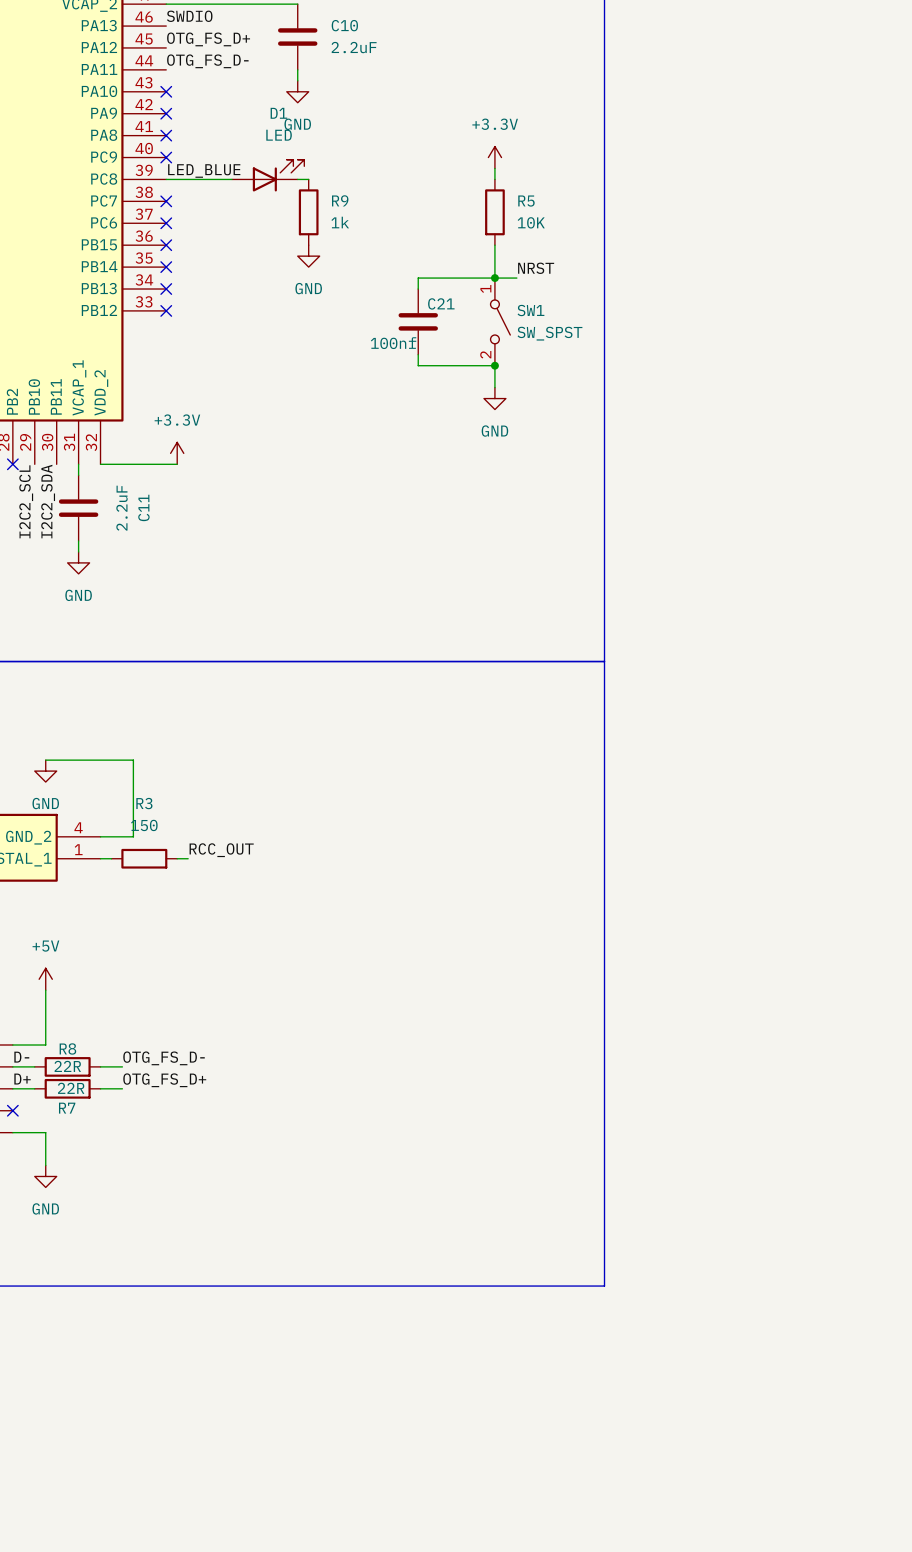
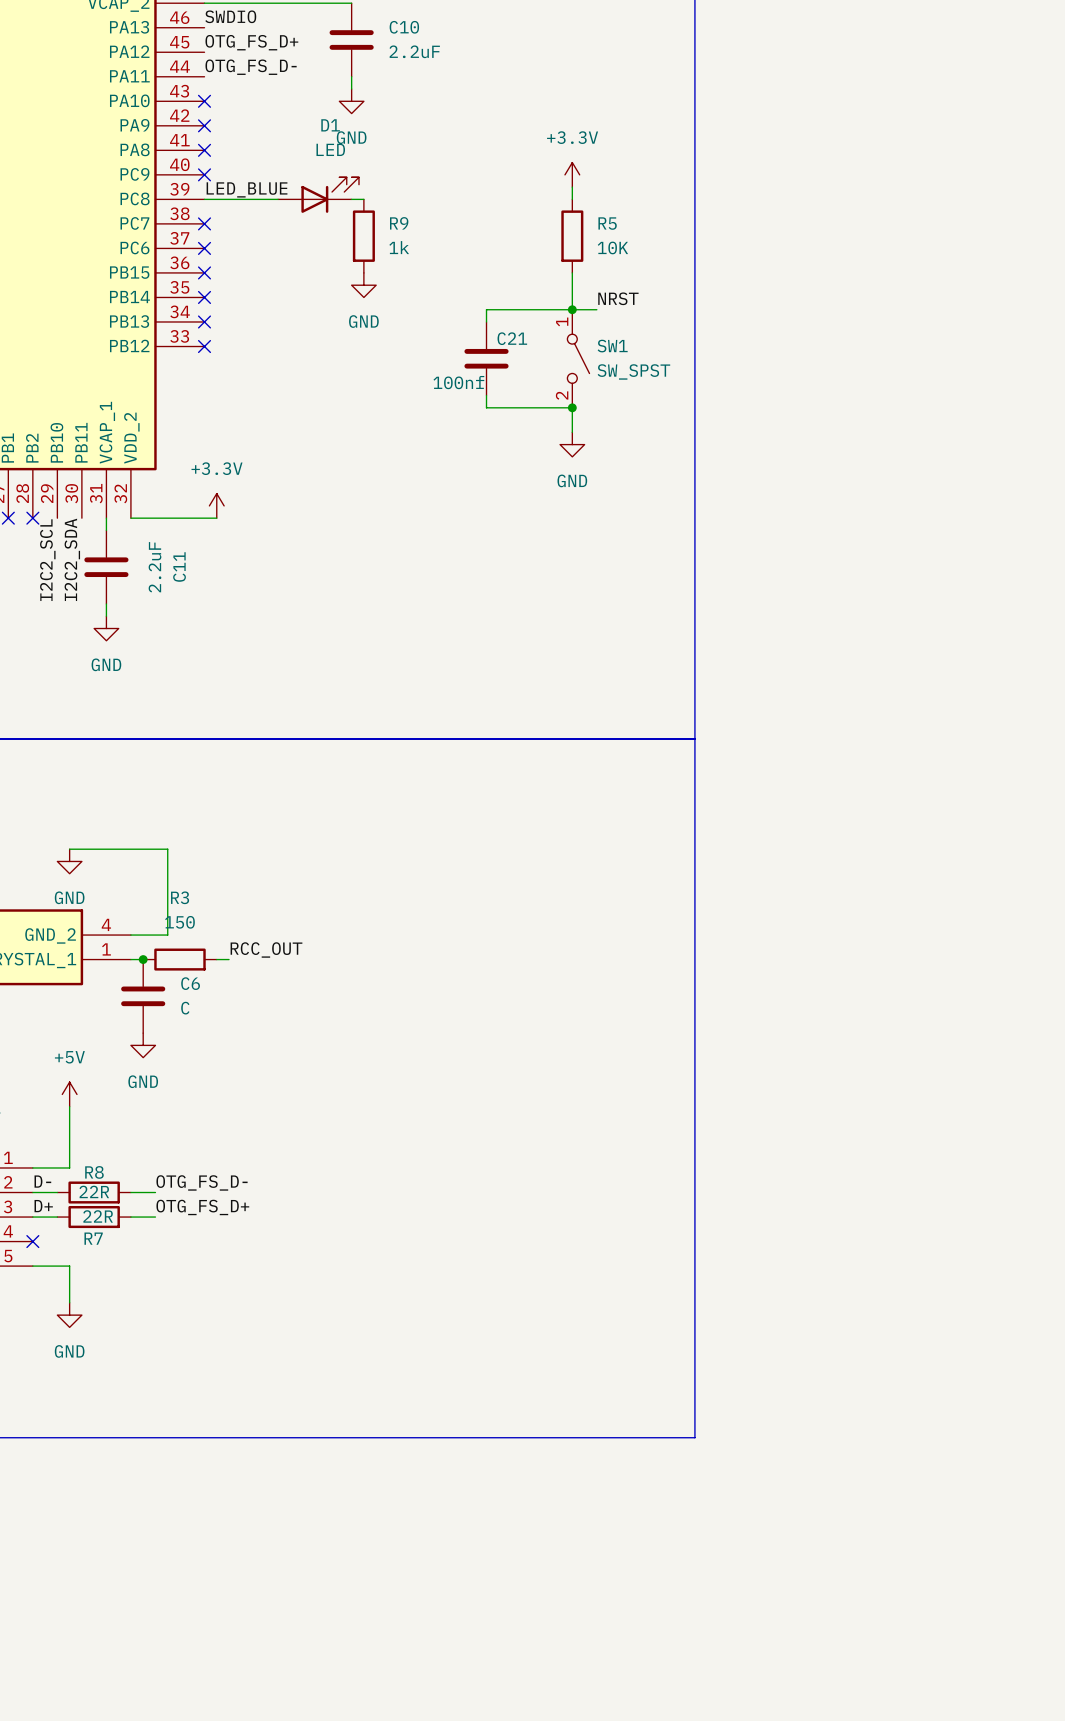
junction: none -> (143, 959)
C6: none -> C (143, 996)
power symbol: none -> GND (143, 1045)

